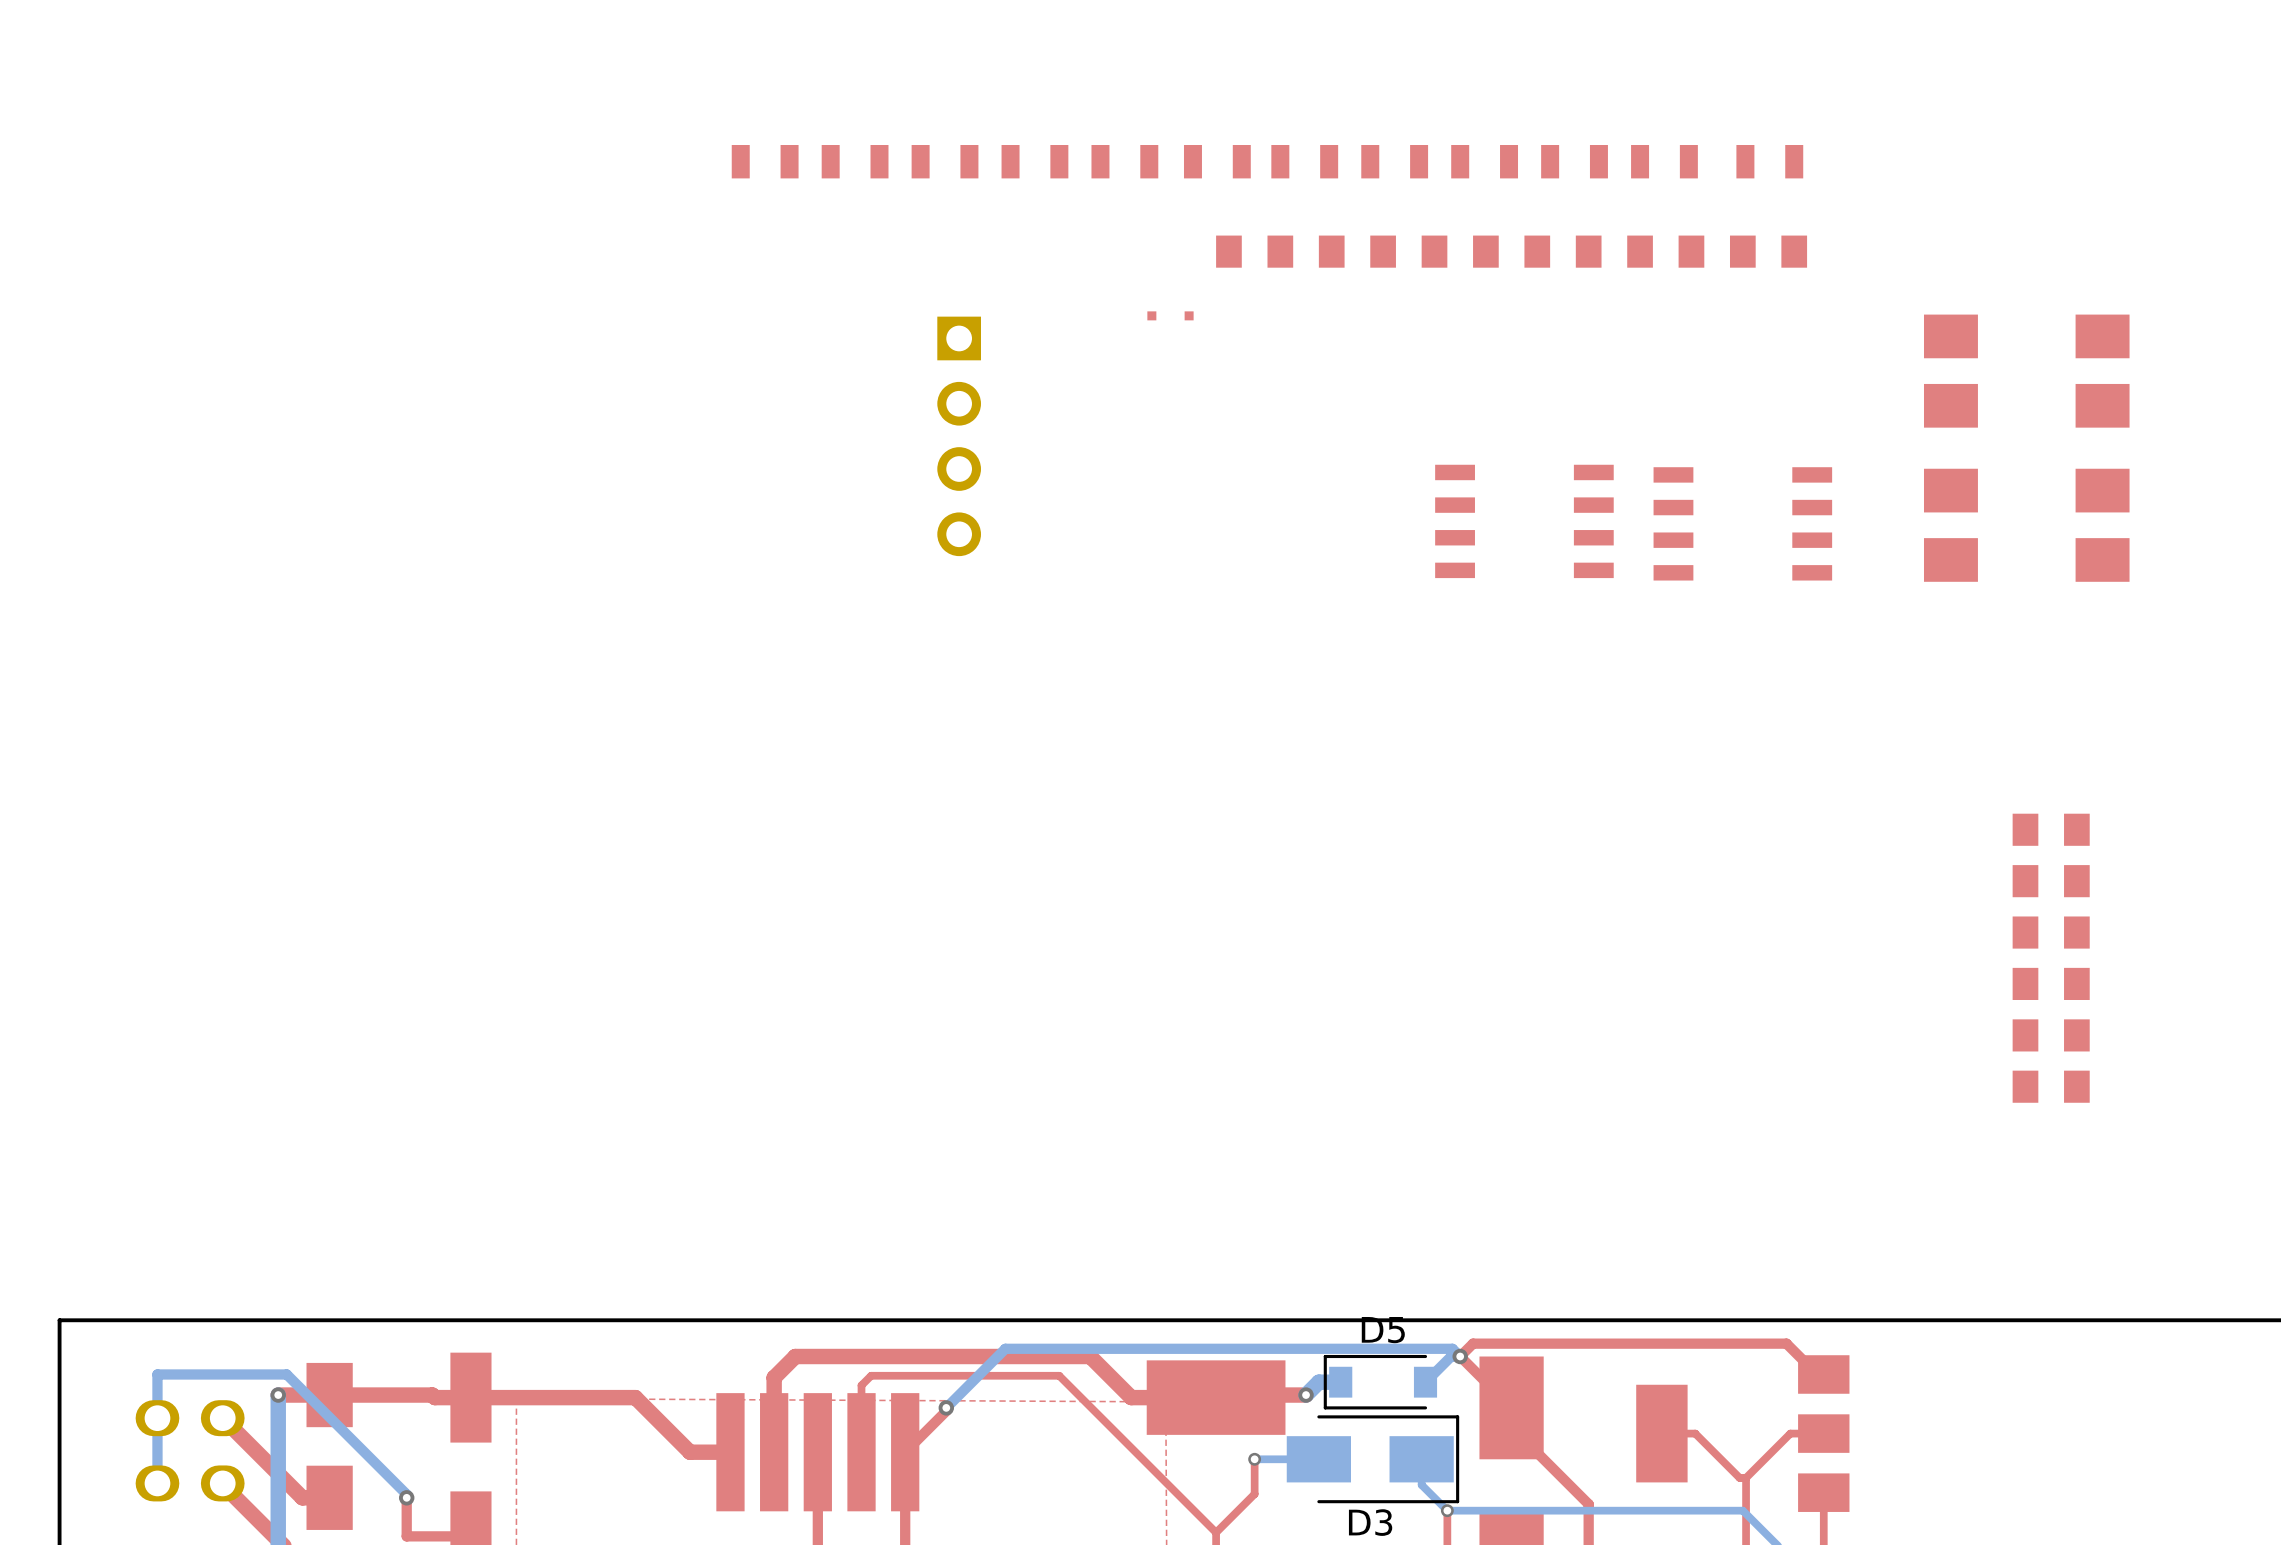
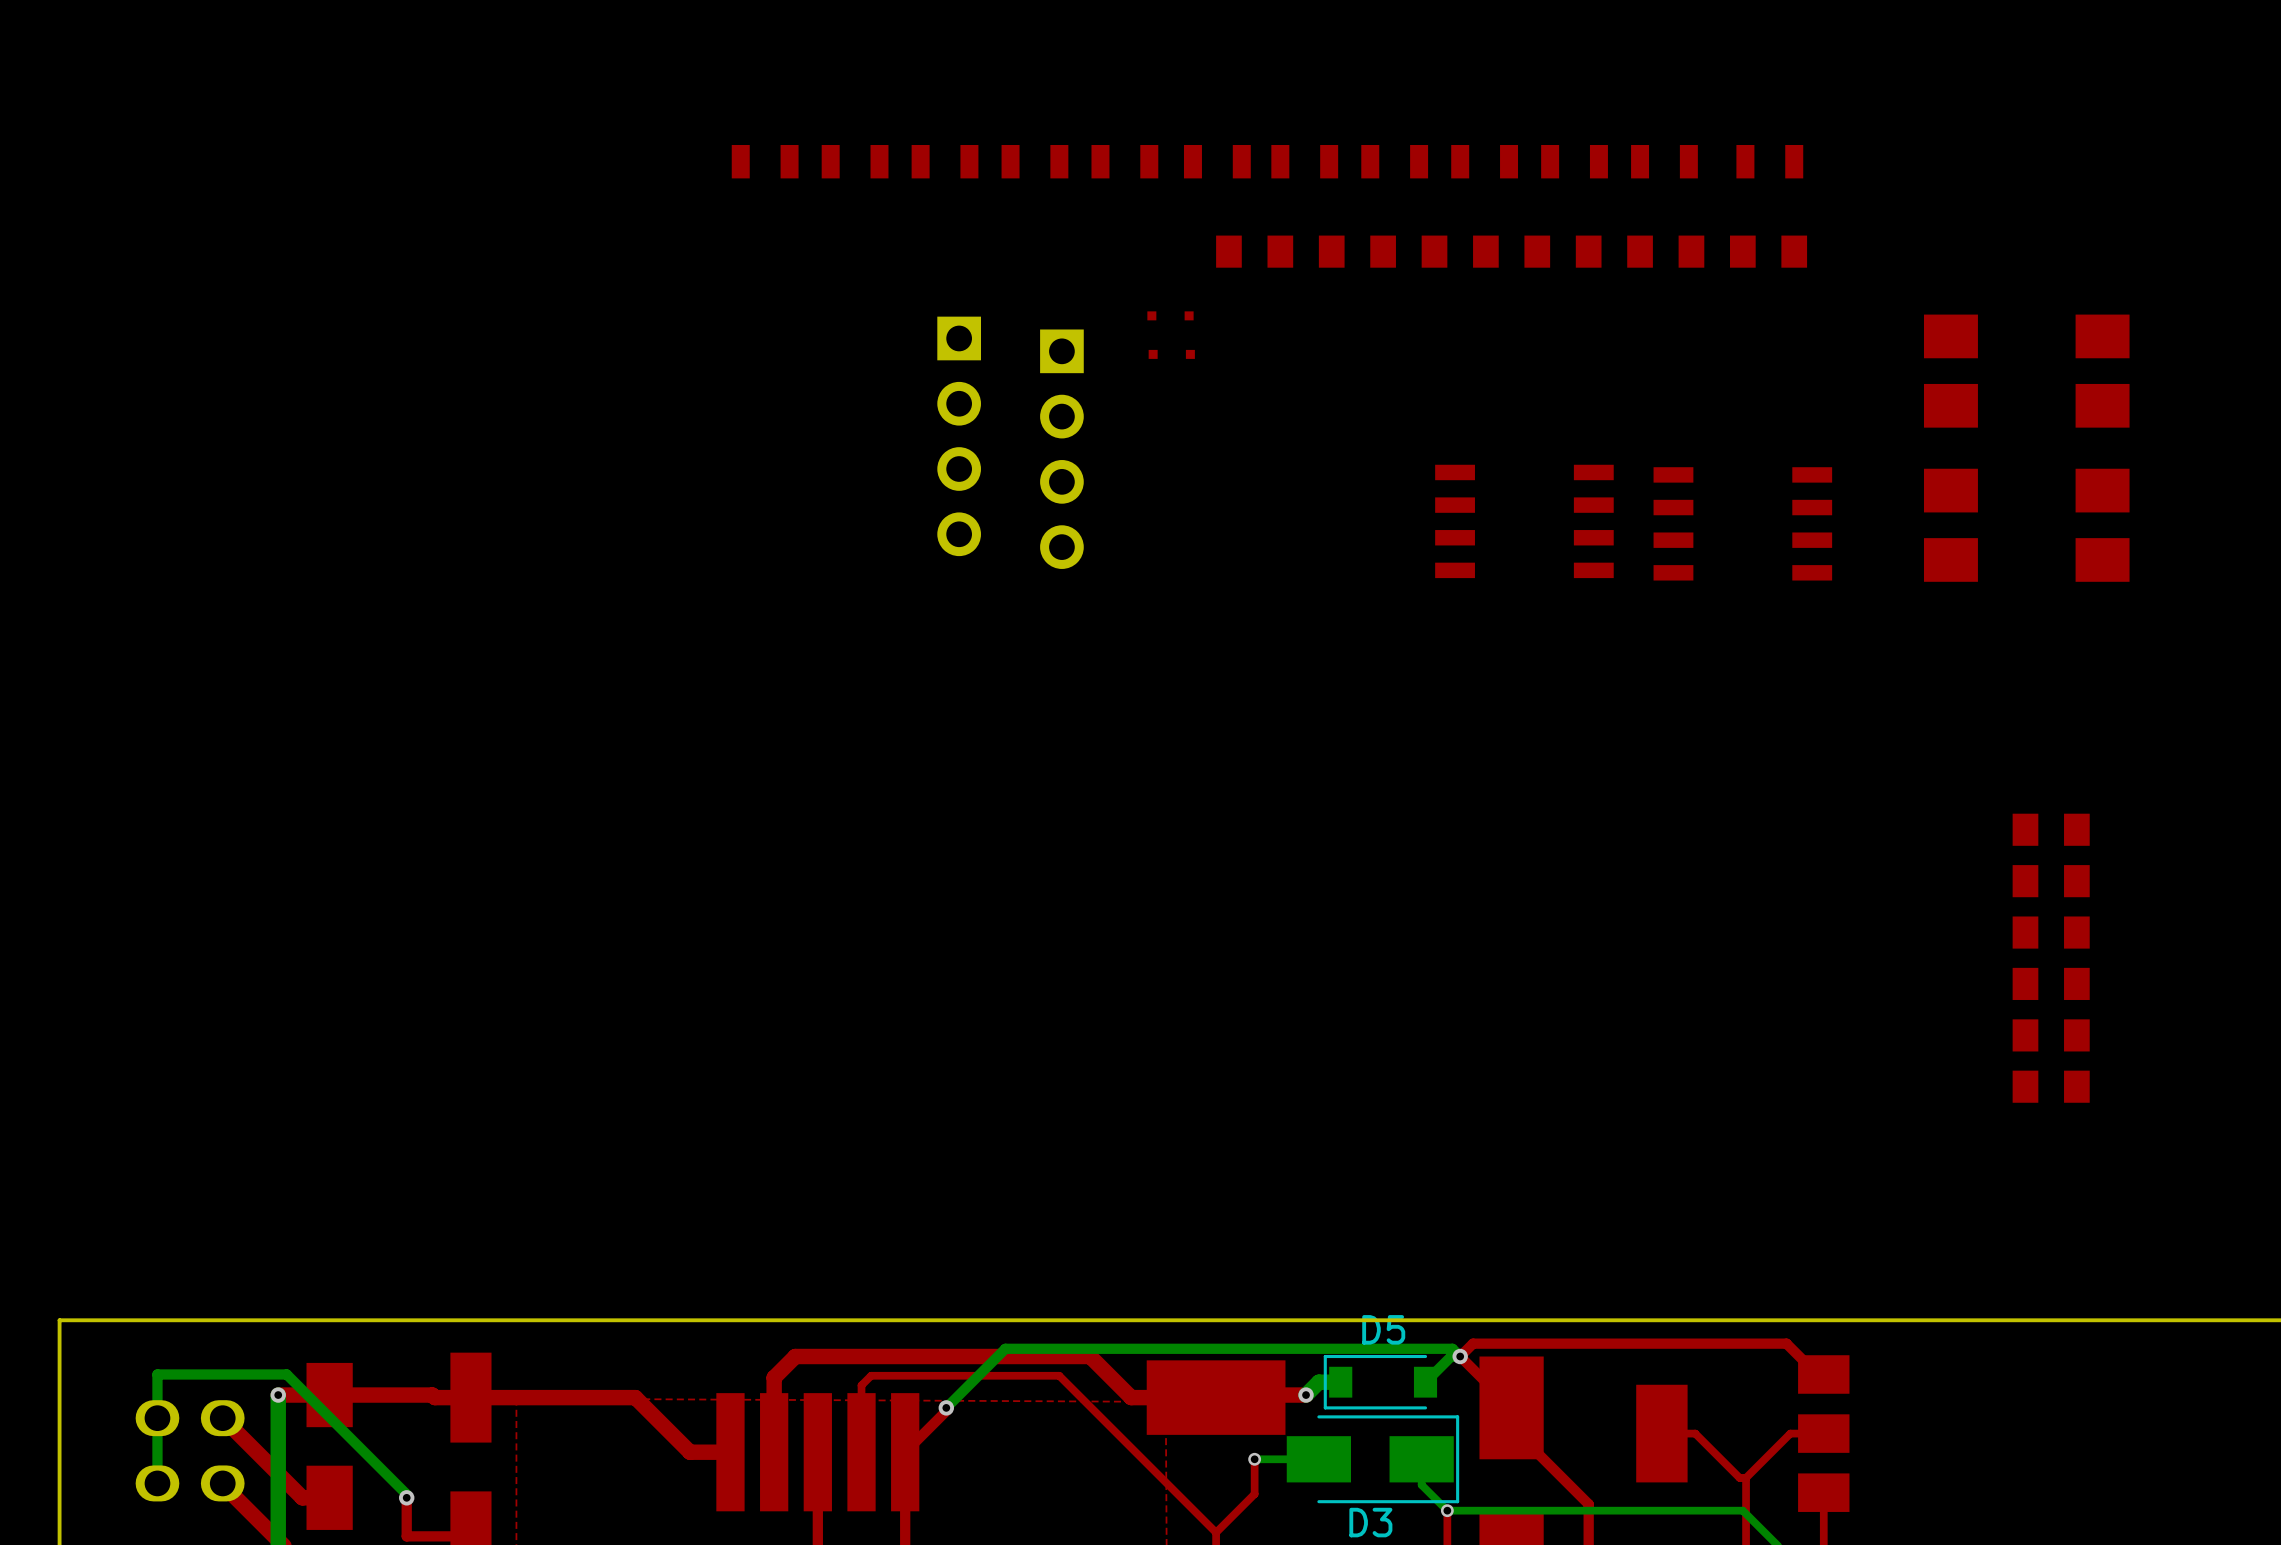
part: none -> (1171, 354)
part: none -> (1061, 449)

